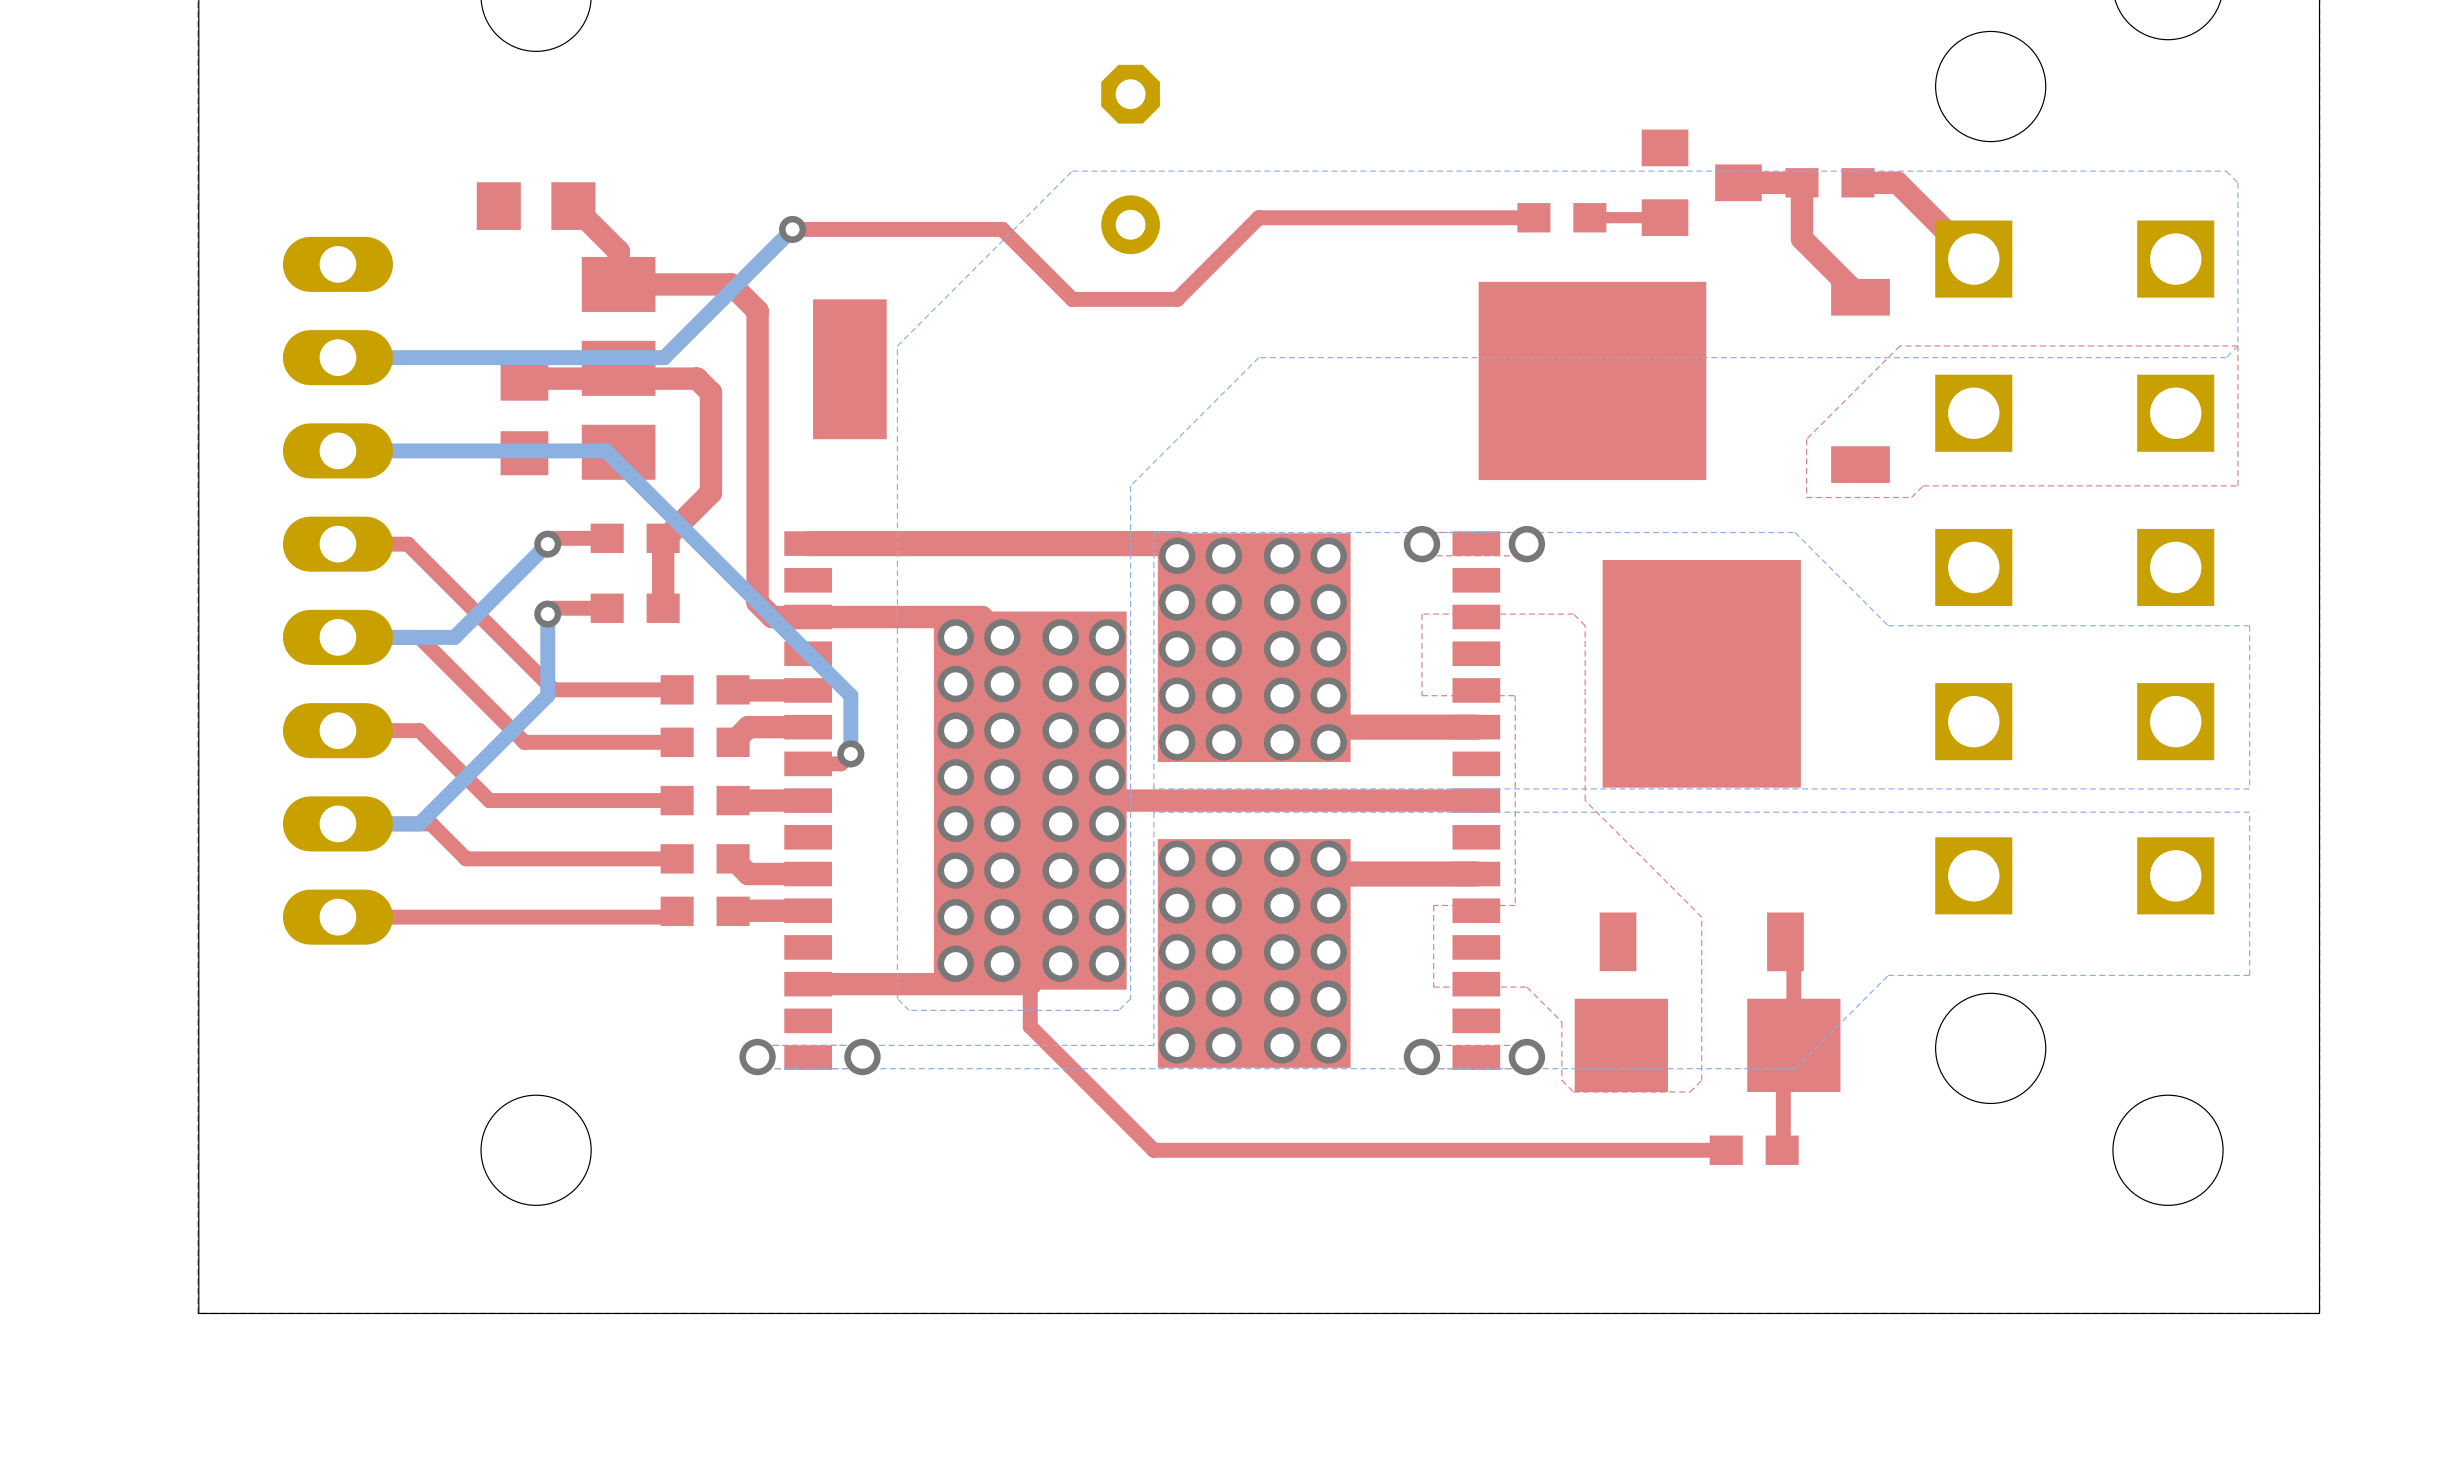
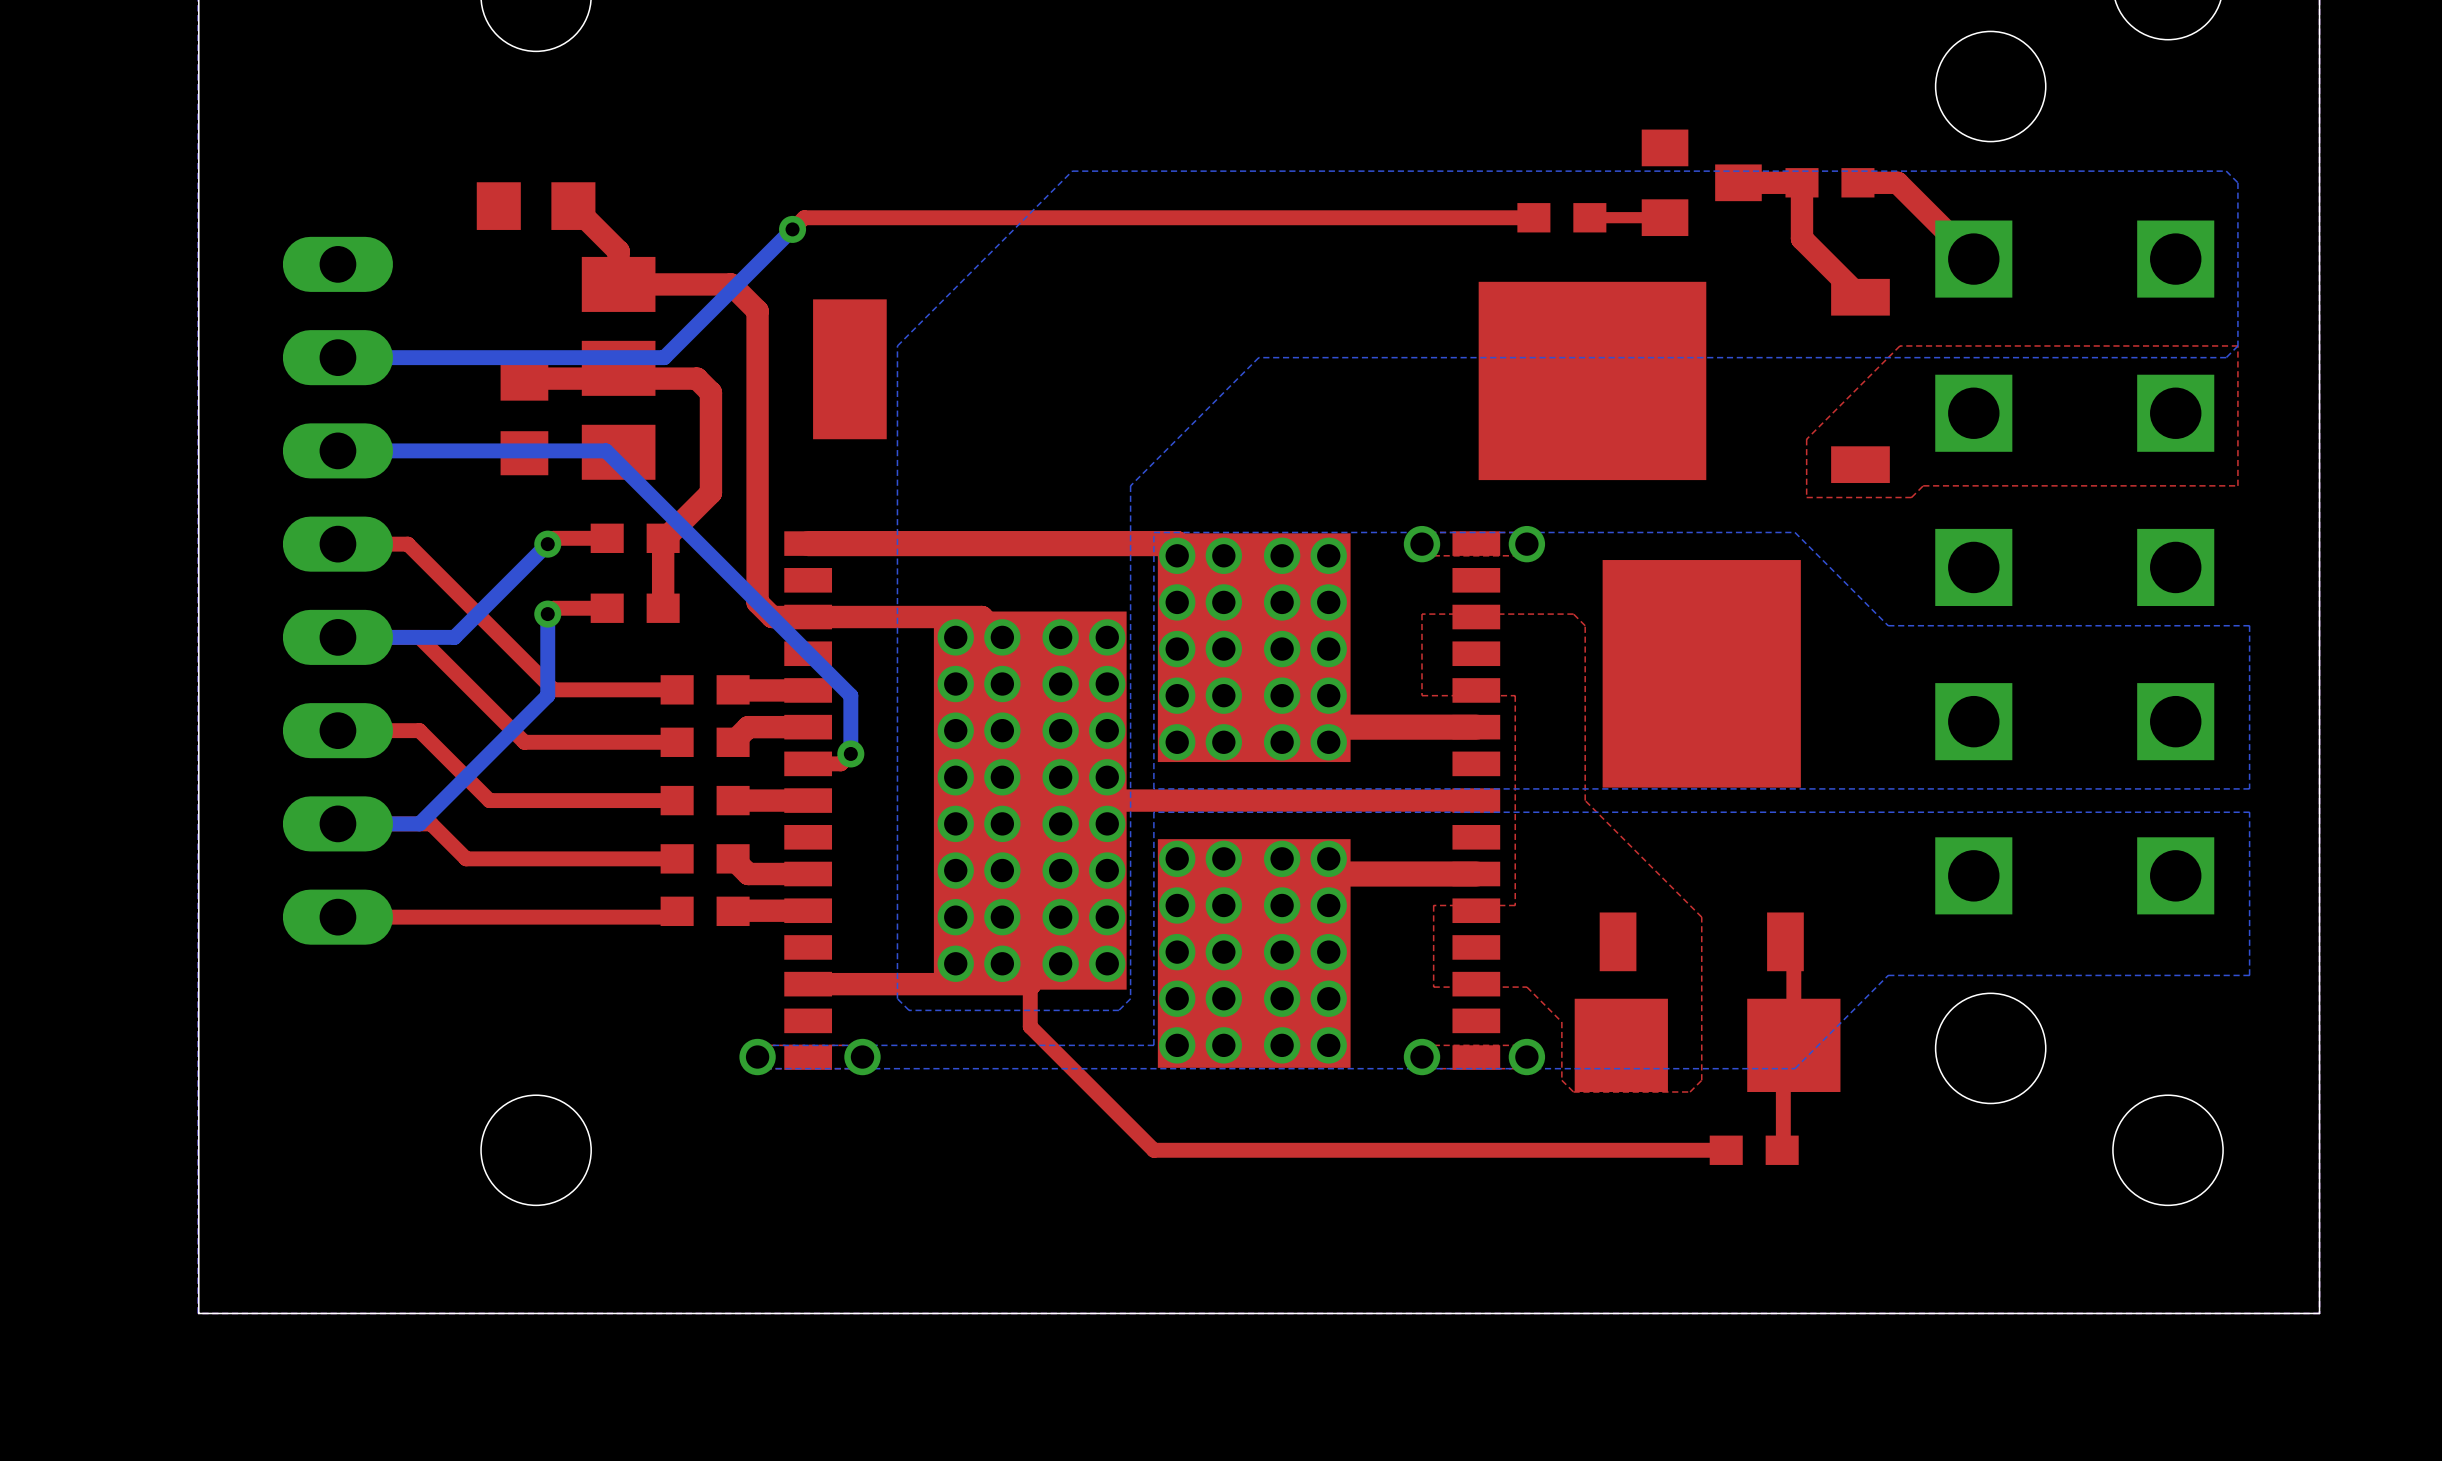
part: (1130, 159) -> none
top track: (1258, 217) (1177, 299) (1072, 299) (1002, 229) (792, 229) -> (1258, 217) (804, 217) (792, 229)

